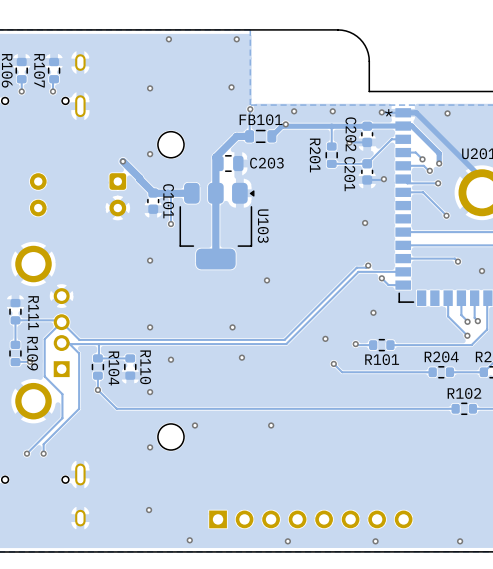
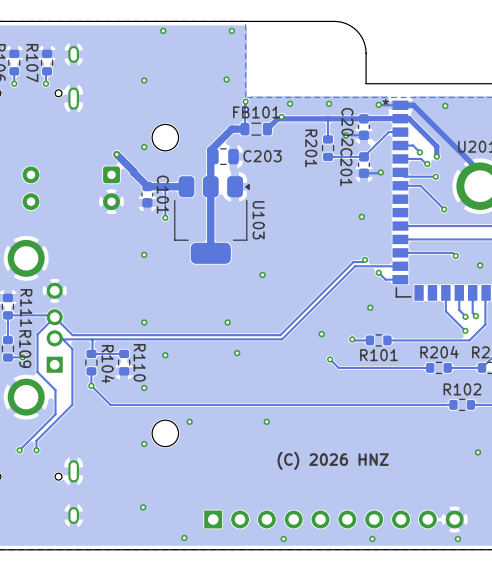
via: none -> (478, 452)
text: none -> (C) 2026 HNZ (333, 460)
part: (310, 519) -> none
part: none -> (333, 519)

